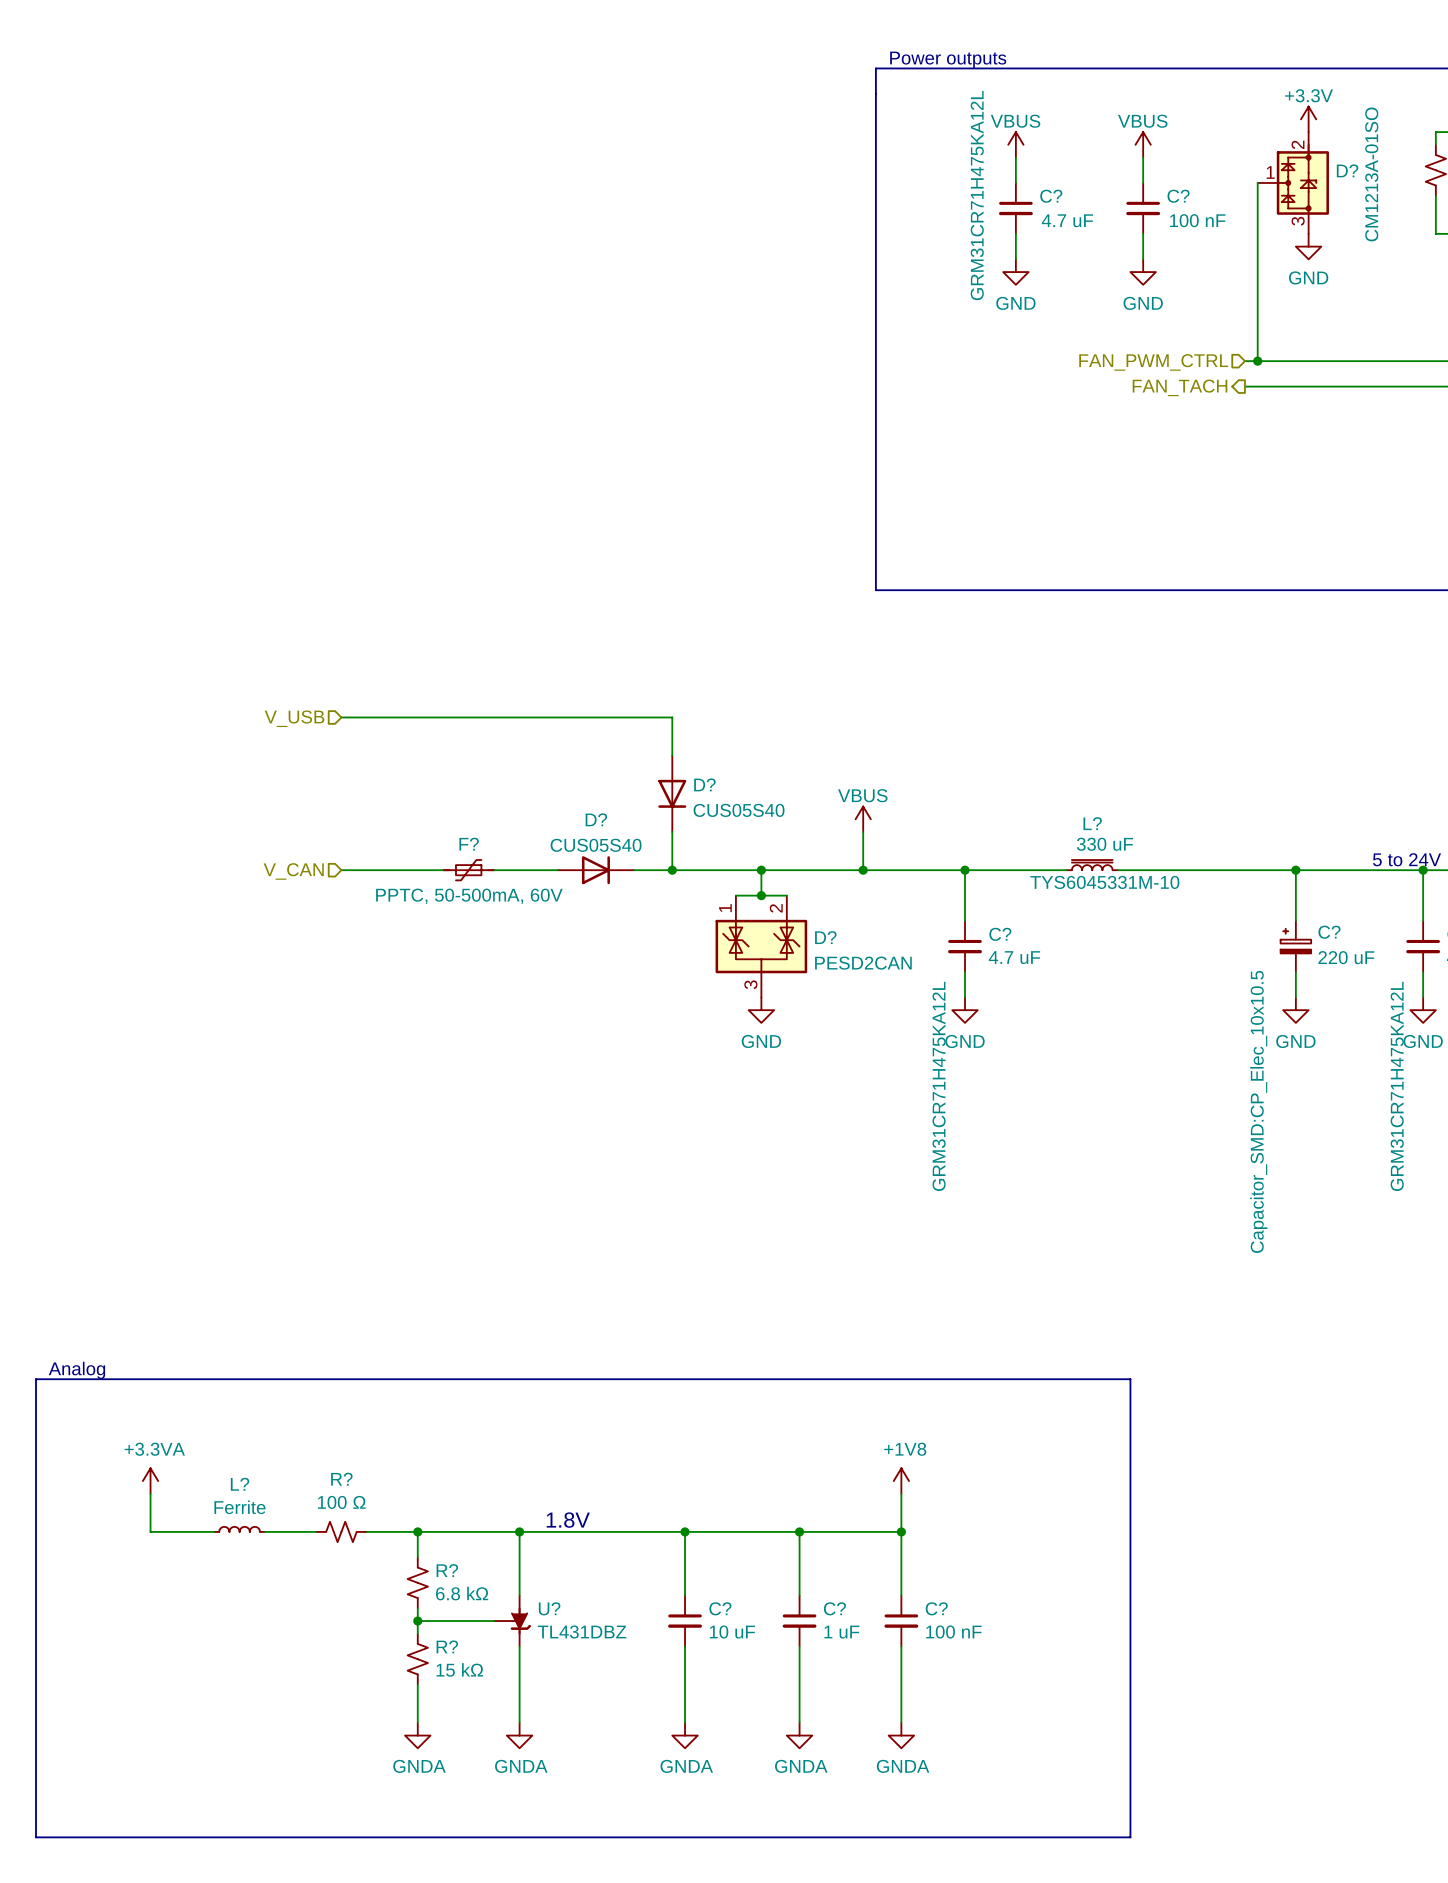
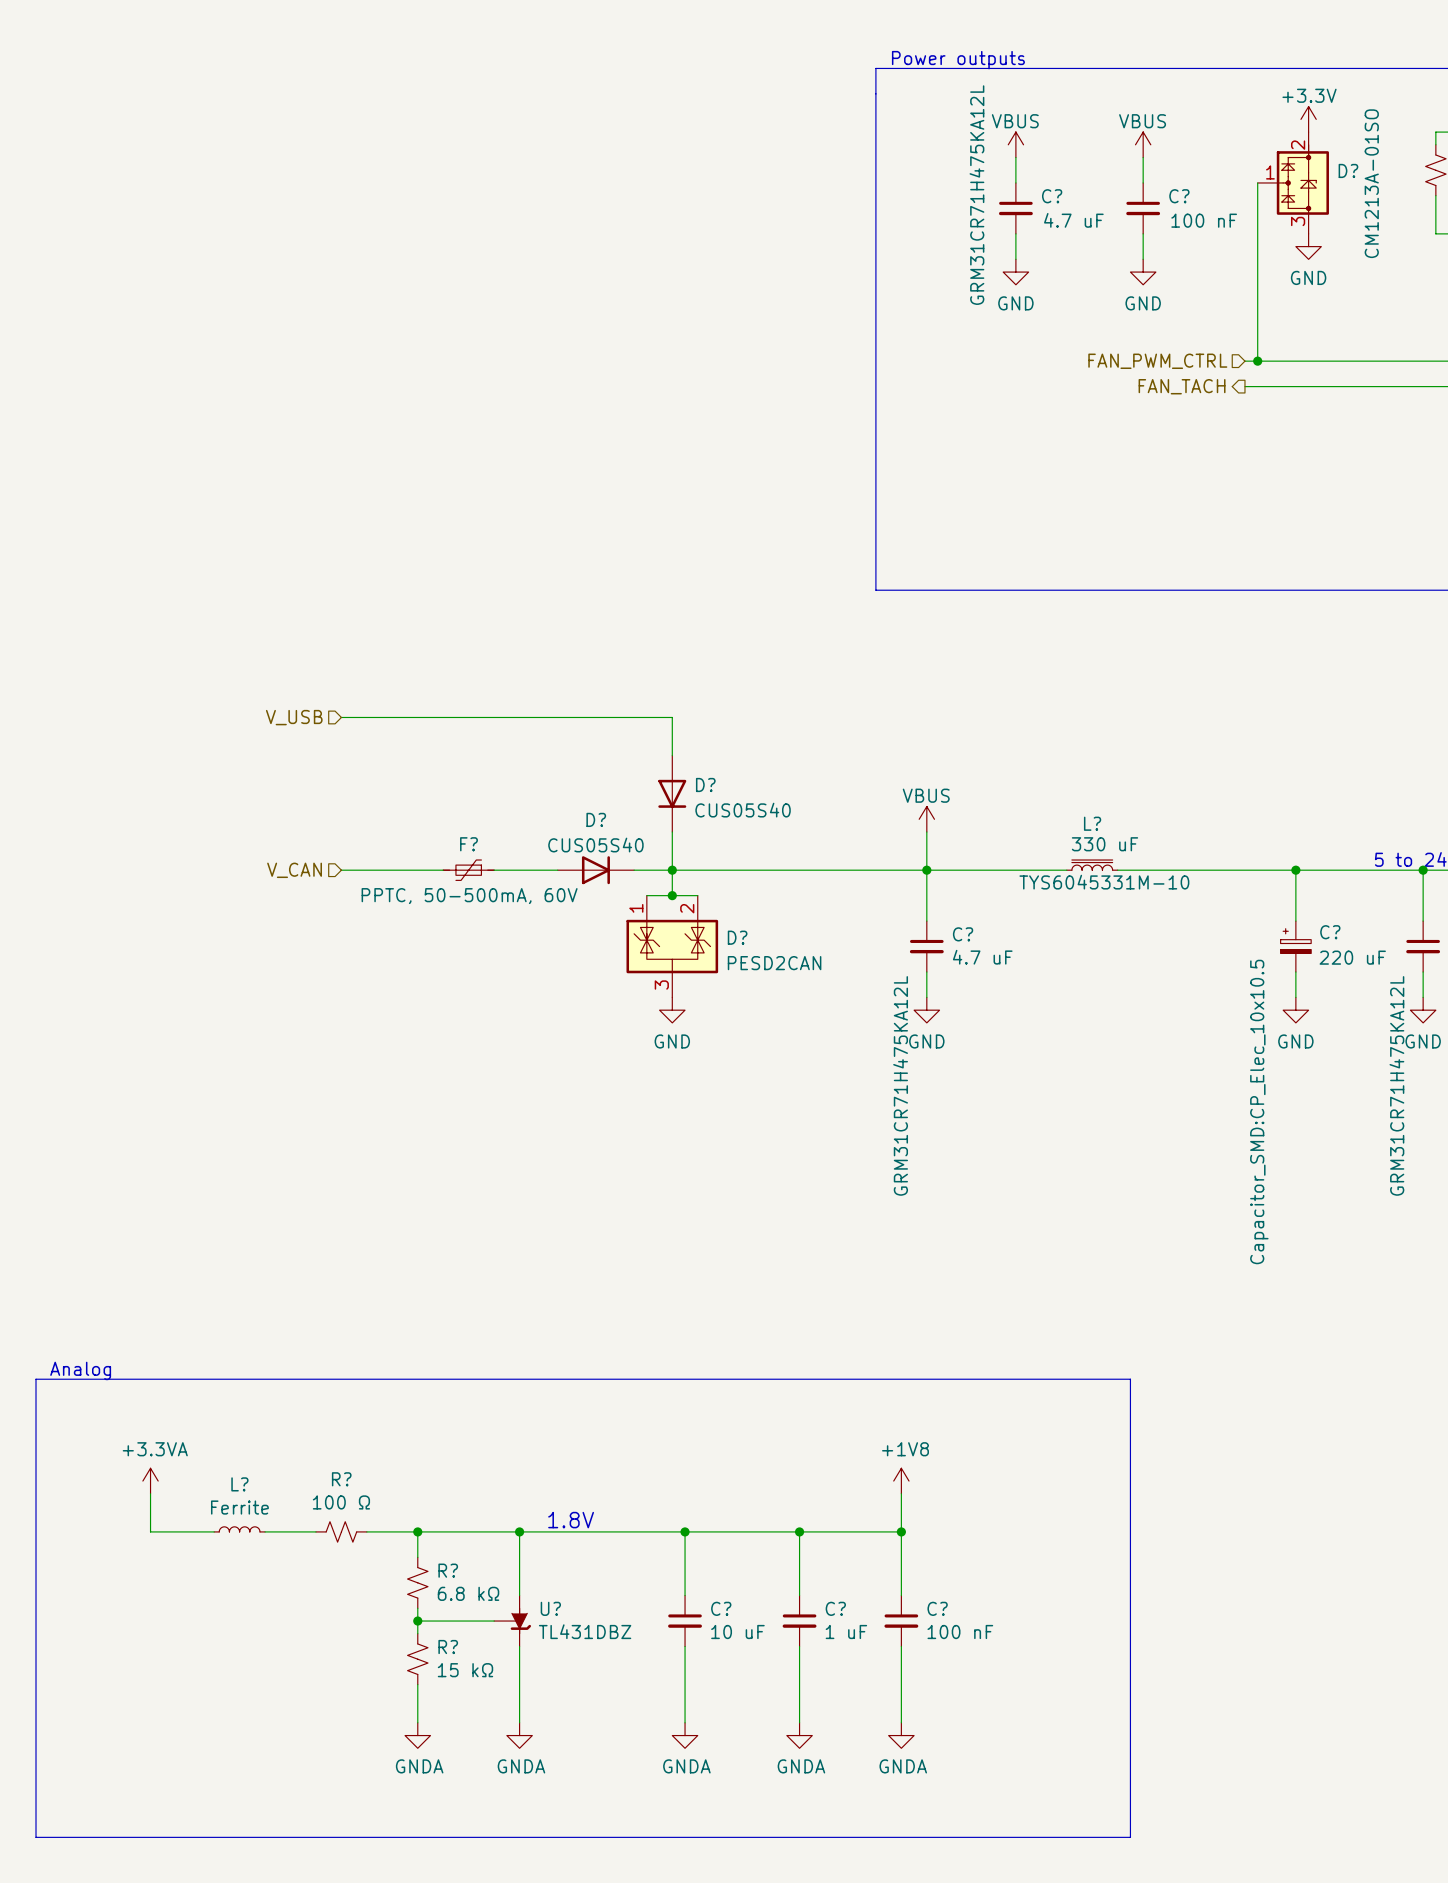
power symbol position: VBUS (863, 819) -> VBUS (926, 819)
wire: (863, 832) (863, 870) -> none
wire: none -> (926, 832) (926, 921)
wire: (761, 870) (761, 895) -> (672, 870) (672, 895)
junction: (761, 870) -> none
junction: (863, 870) -> none
junction: none -> (926, 870)
wire: (965, 870) (965, 921) -> none
junction: (965, 870) -> none
junction: none -> (672, 895)
wire: (735, 895) (786, 895) -> (646, 895) (697, 895)
junction: (761, 895) -> none
D? position: (761, 946) -> (672, 946)
C? position: (965, 946) -> (926, 946)
wire: (965, 971) (965, 997) -> (926, 971) (926, 997)
power symbol: none -> GND (672, 1010)
power symbol: GND (761, 1010) -> none
power symbol position: GND (965, 1010) -> GND (926, 1010)

